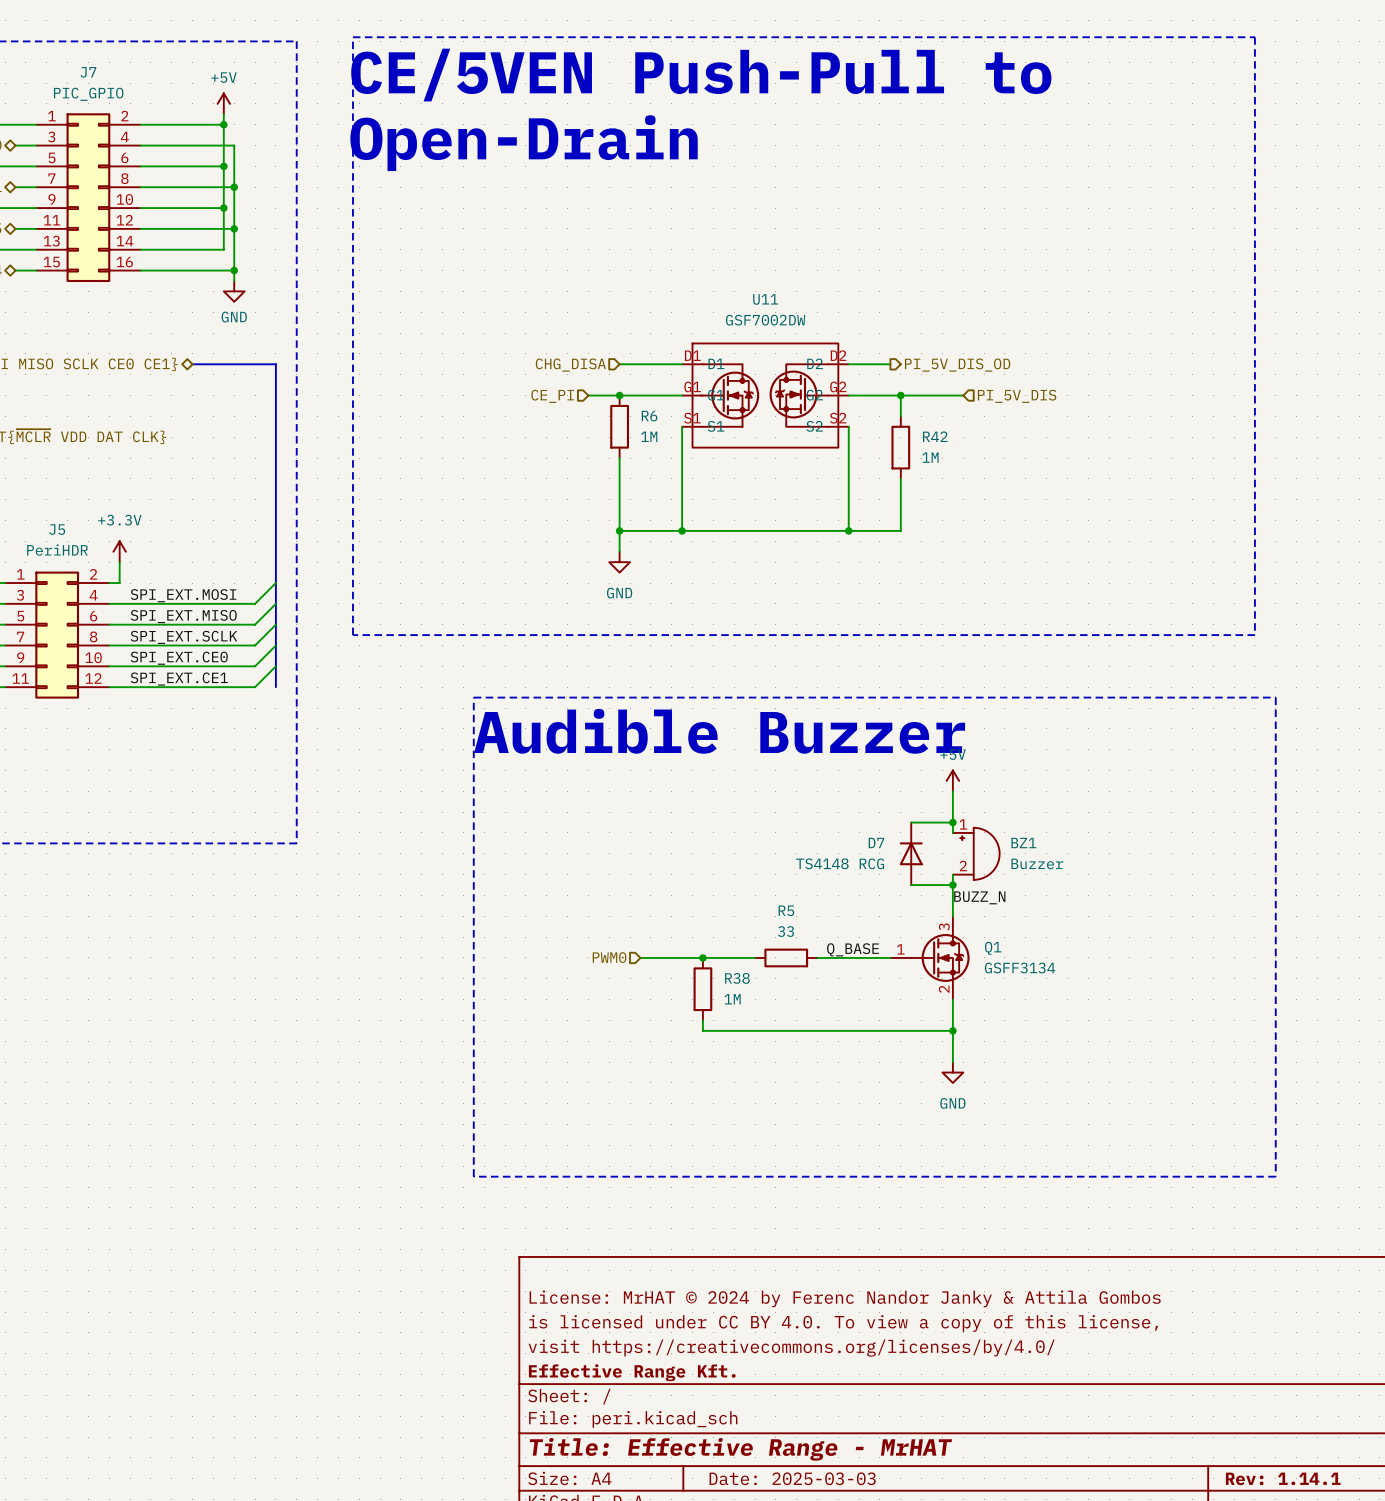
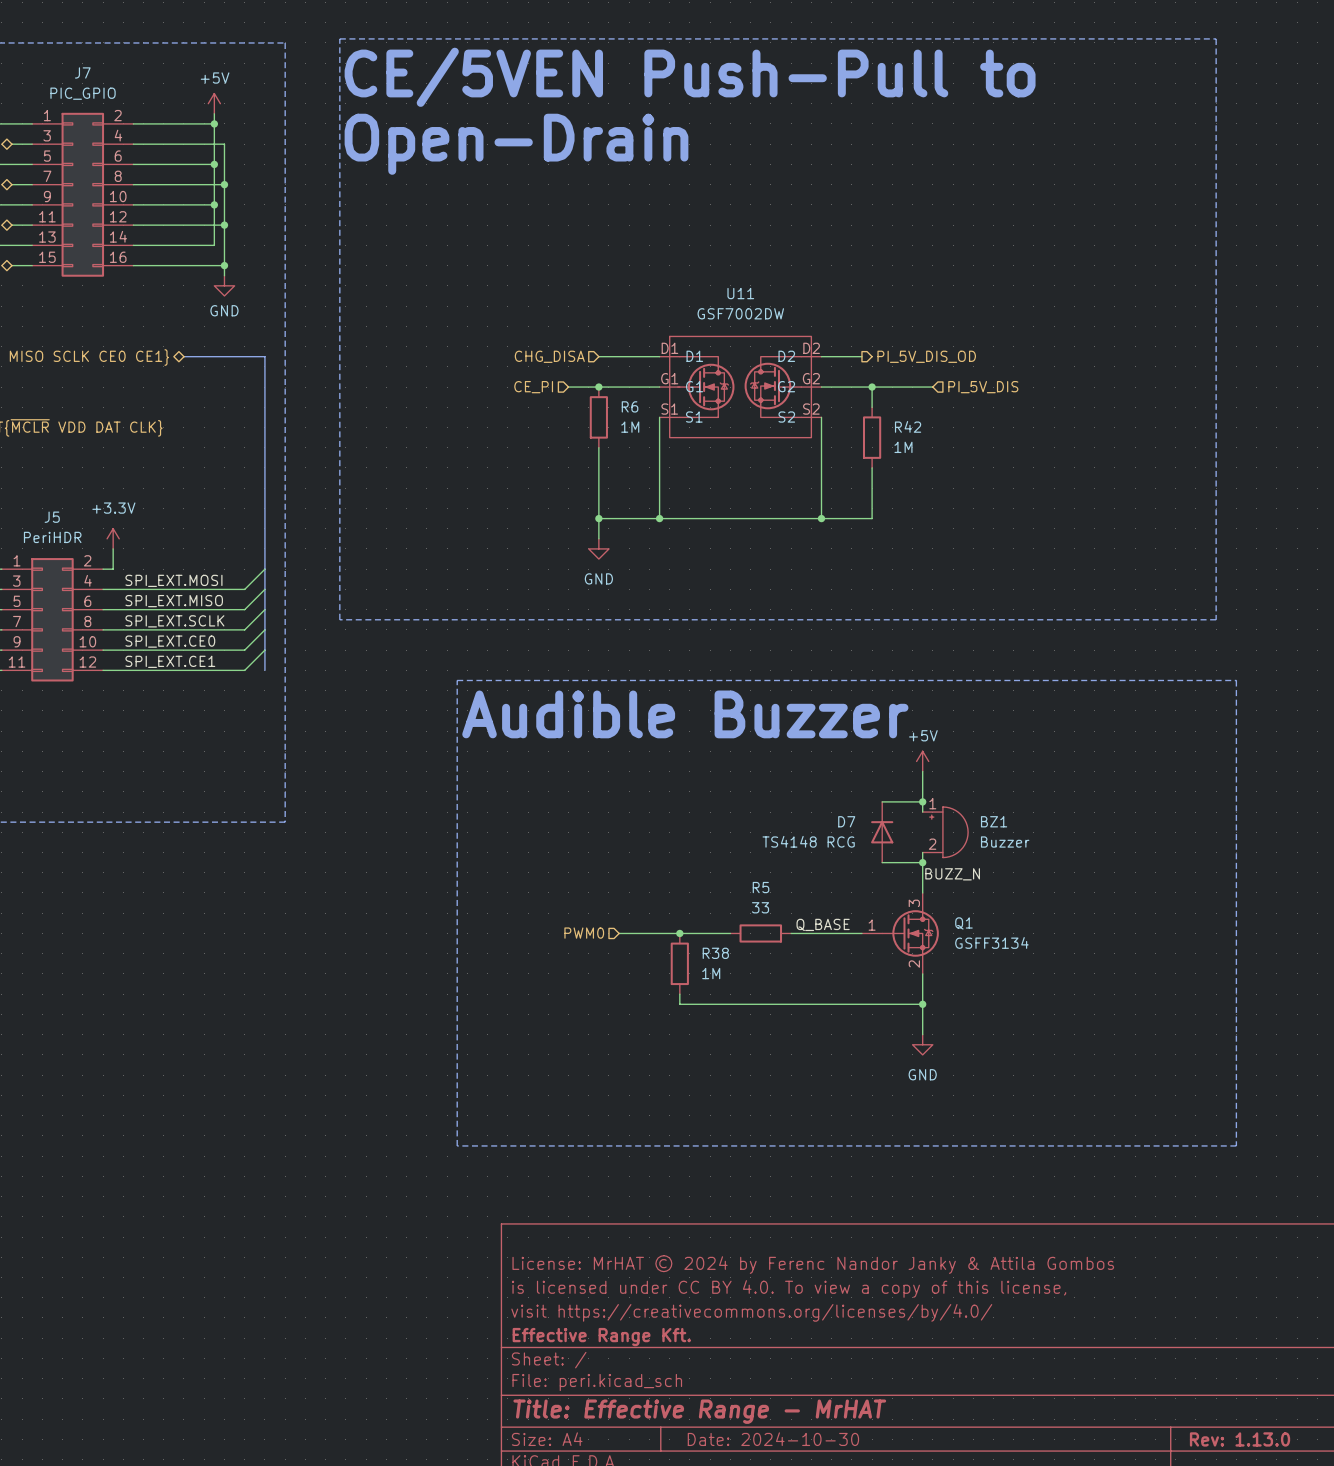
title block: Date: 2025-03-03 (792, 1478) -> Date: 2024-10-30 (773, 1439)
title block: Rev: 1.14.1 (1283, 1478) -> Rev: 1.13.0 (1240, 1439)

